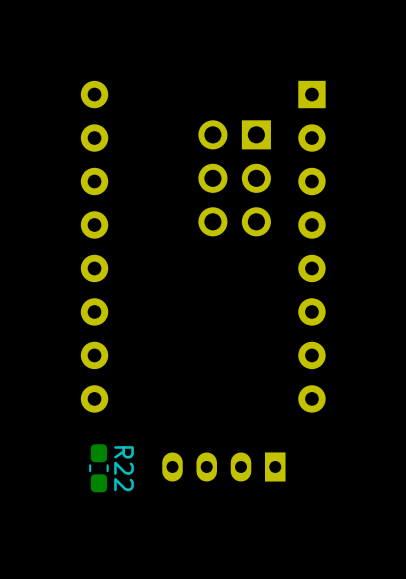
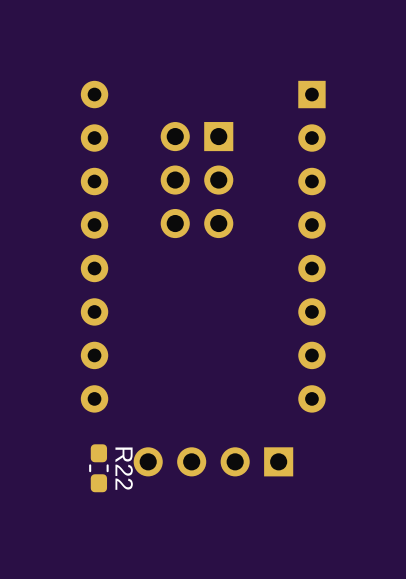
part position: (234, 178) -> (196, 180)
part footprint: [162, 452, 286, 482] -> [133, 447, 294, 477]

